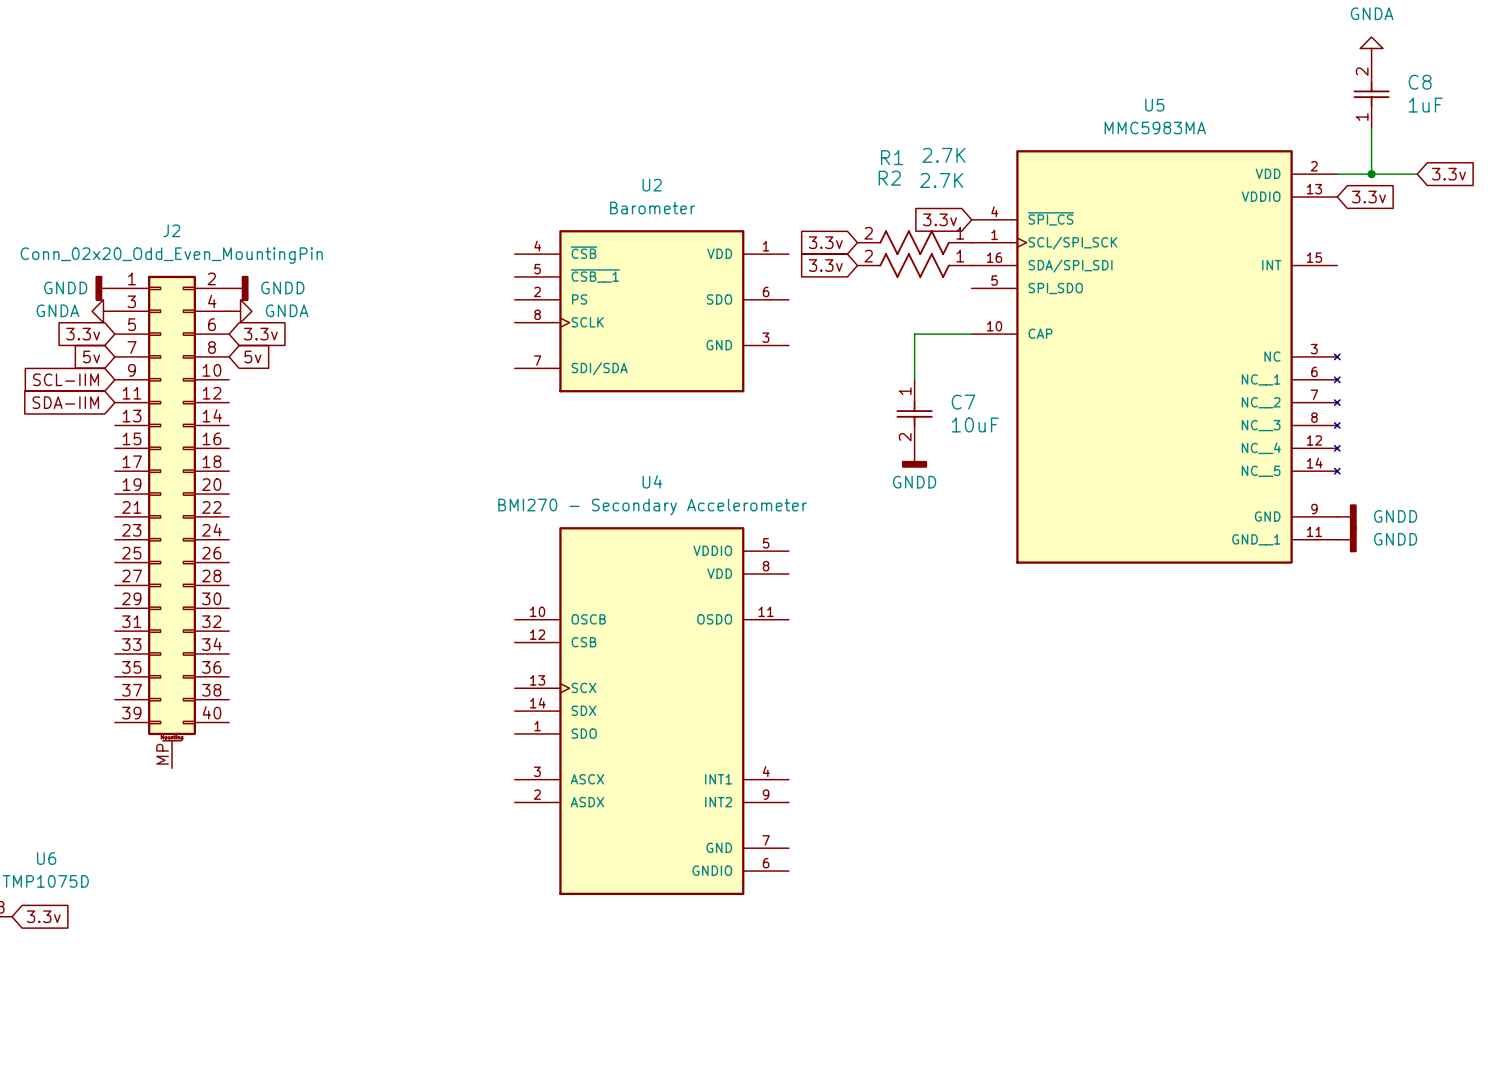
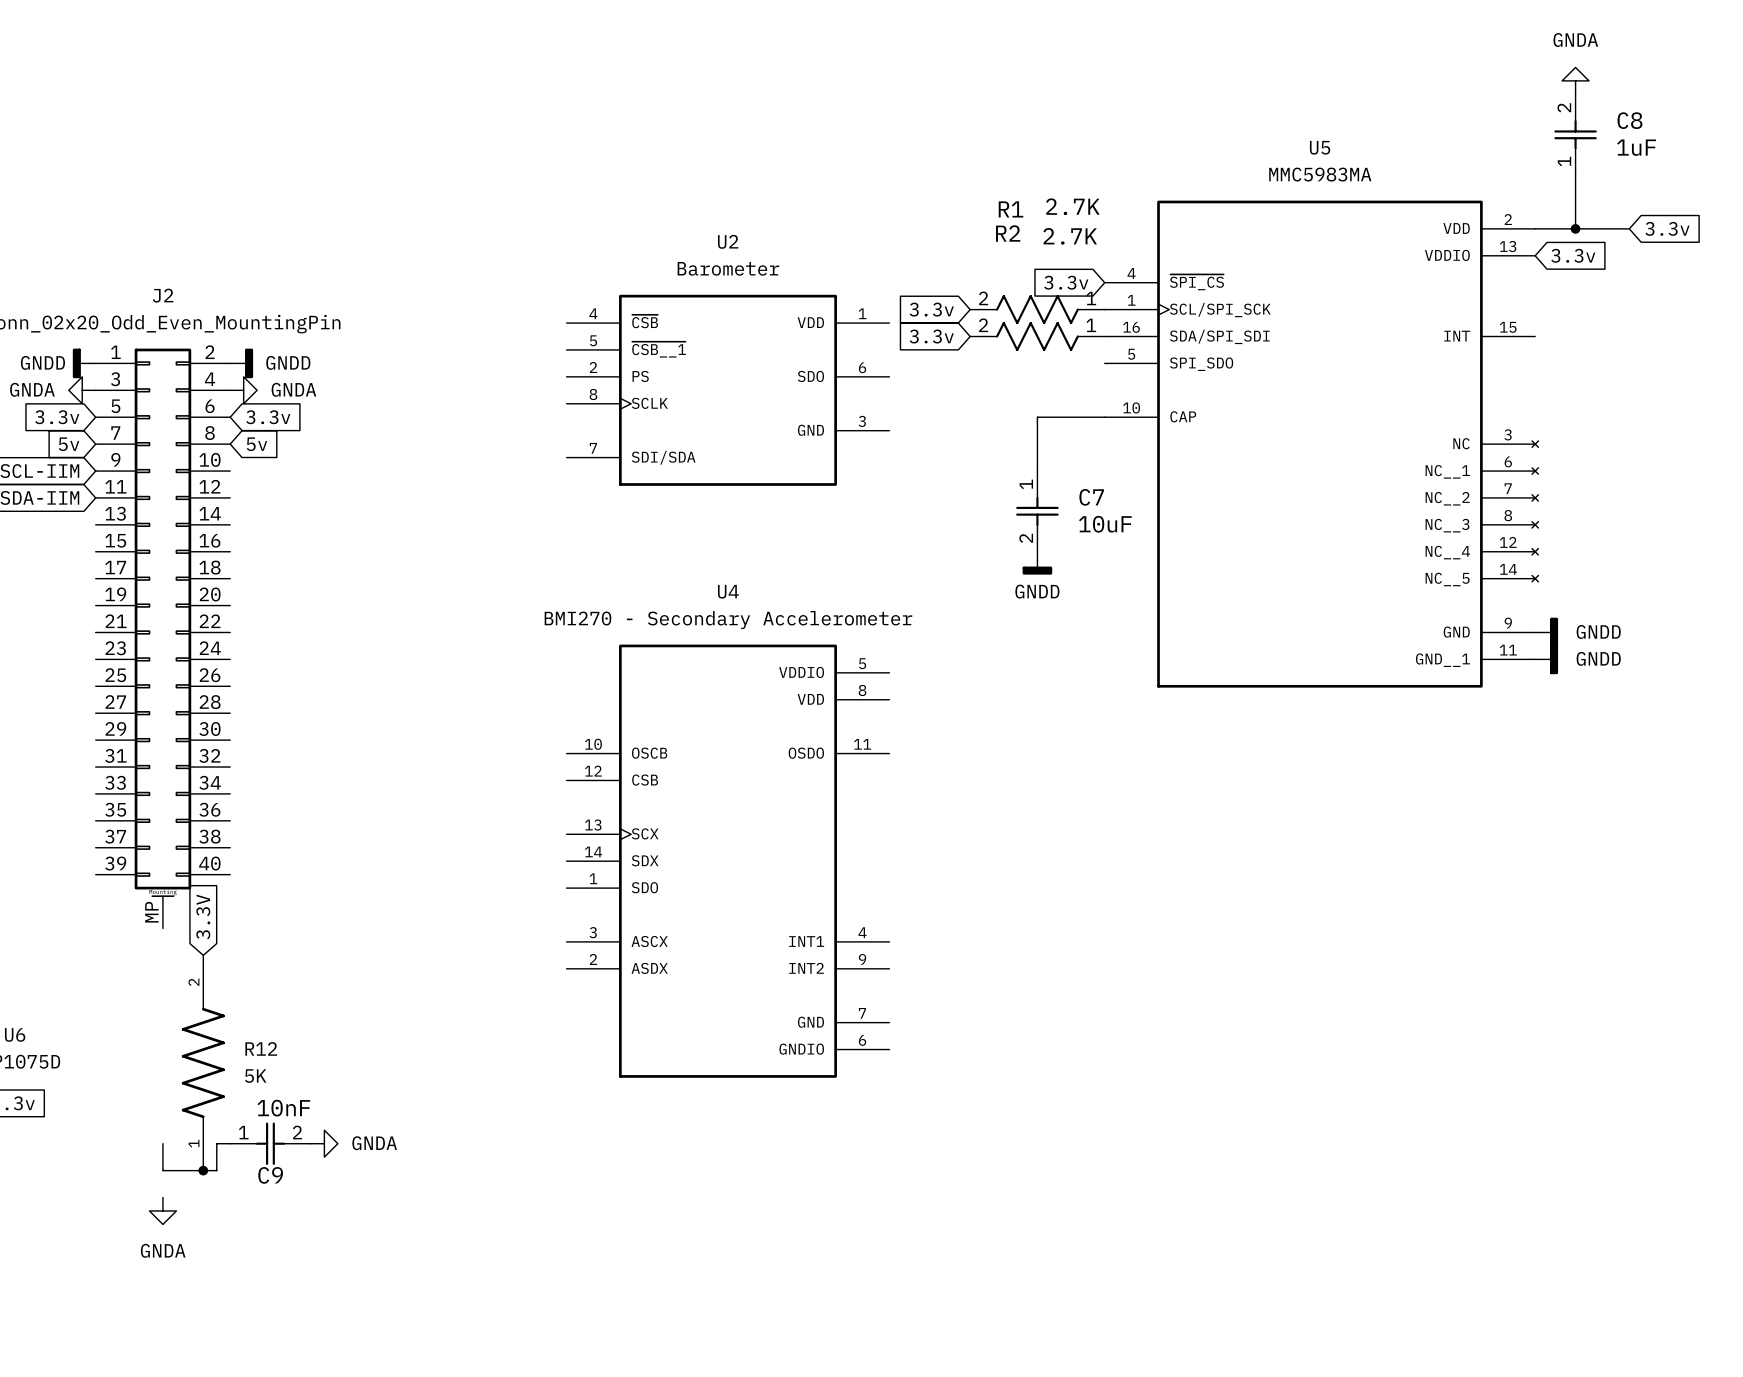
global label: none -> 3.3V (203, 916)
R12: none -> 5K (203, 1062)
wire: none -> (162, 1143) (162, 1170) (216, 1170) (216, 1143) (230, 1143)
C9: none -> 10nF (270, 1143)
power symbol: none -> GNDA (324, 1143)
junction: none -> (203, 1170)
power symbol: none -> GNDA (162, 1210)

